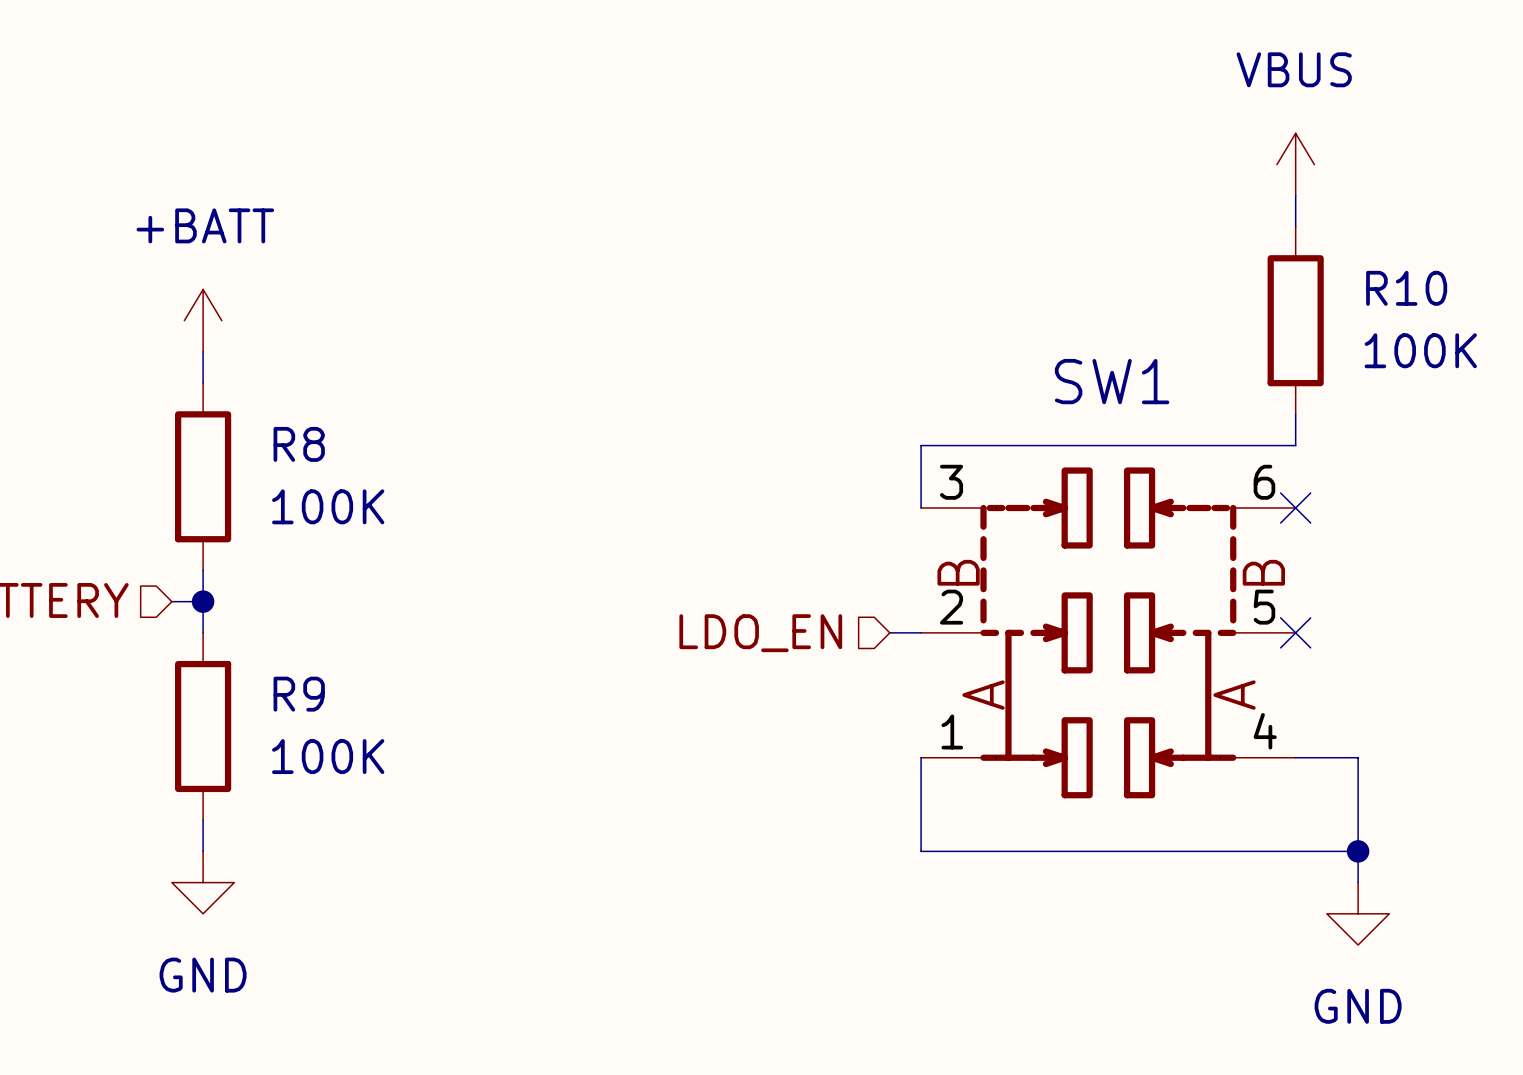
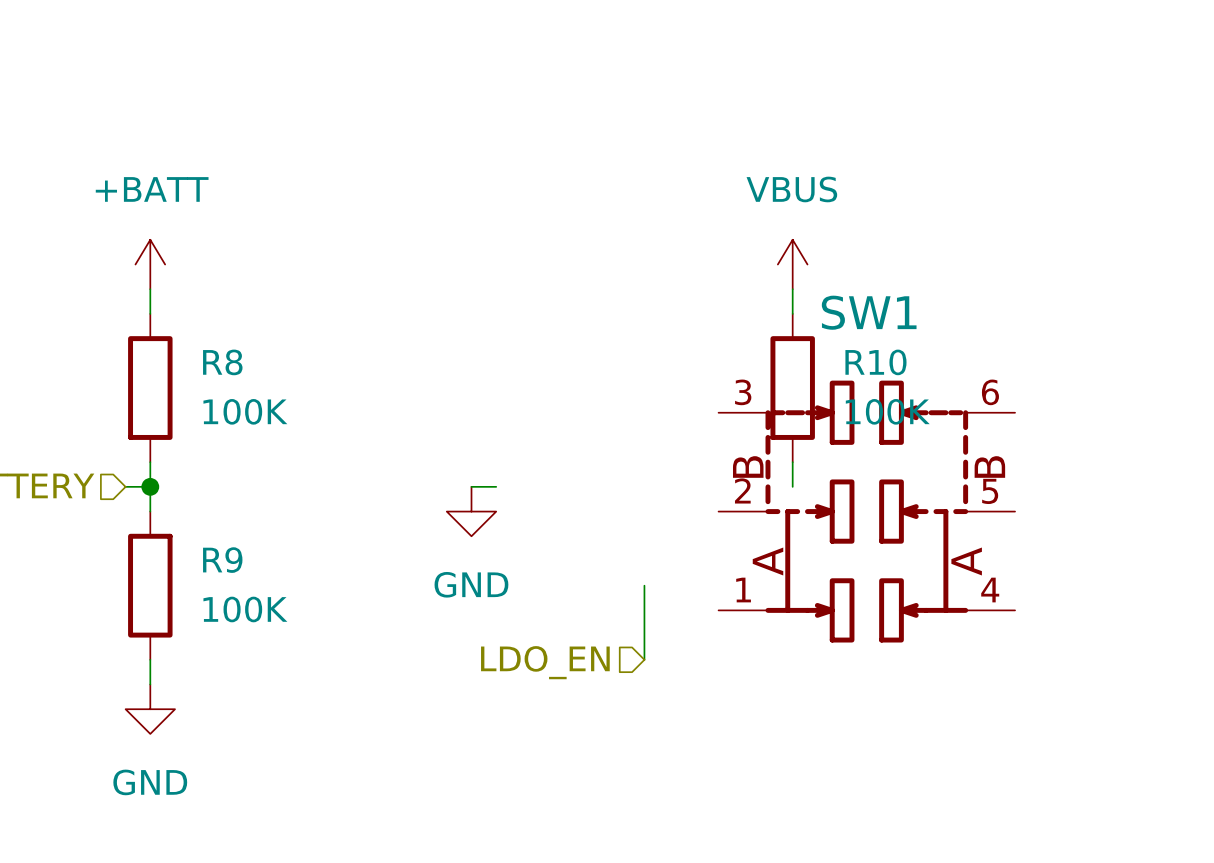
power symbol position: VBUS (1295, 164) -> VBUS (792, 264)
wire: (1295, 195) (1295, 227) -> (792, 289) (792, 313)
R10 position: (1295, 320) -> (792, 388)
wire: (1295, 414) (1295, 445) (921, 445) (921, 508) -> none
no-connect mark: (1295, 508) -> none
wire: none -> (792, 462) (792, 486)
power symbol: none -> GND (471, 511)
wire: (889, 632) (921, 632) -> (471, 486) (496, 486)
no-connect mark: (1295, 632) -> none
hierarchical label position: LDO_EN (760, 633) -> LDO_EN (545, 662)
wire: none -> (644, 585) (644, 659)
wire: (921, 757) (921, 851) (1358, 851) -> none
wire: (1295, 757) (1358, 757) (1358, 882) -> none
junction: (1358, 851) -> none
power symbol: GND (1358, 913) -> none

